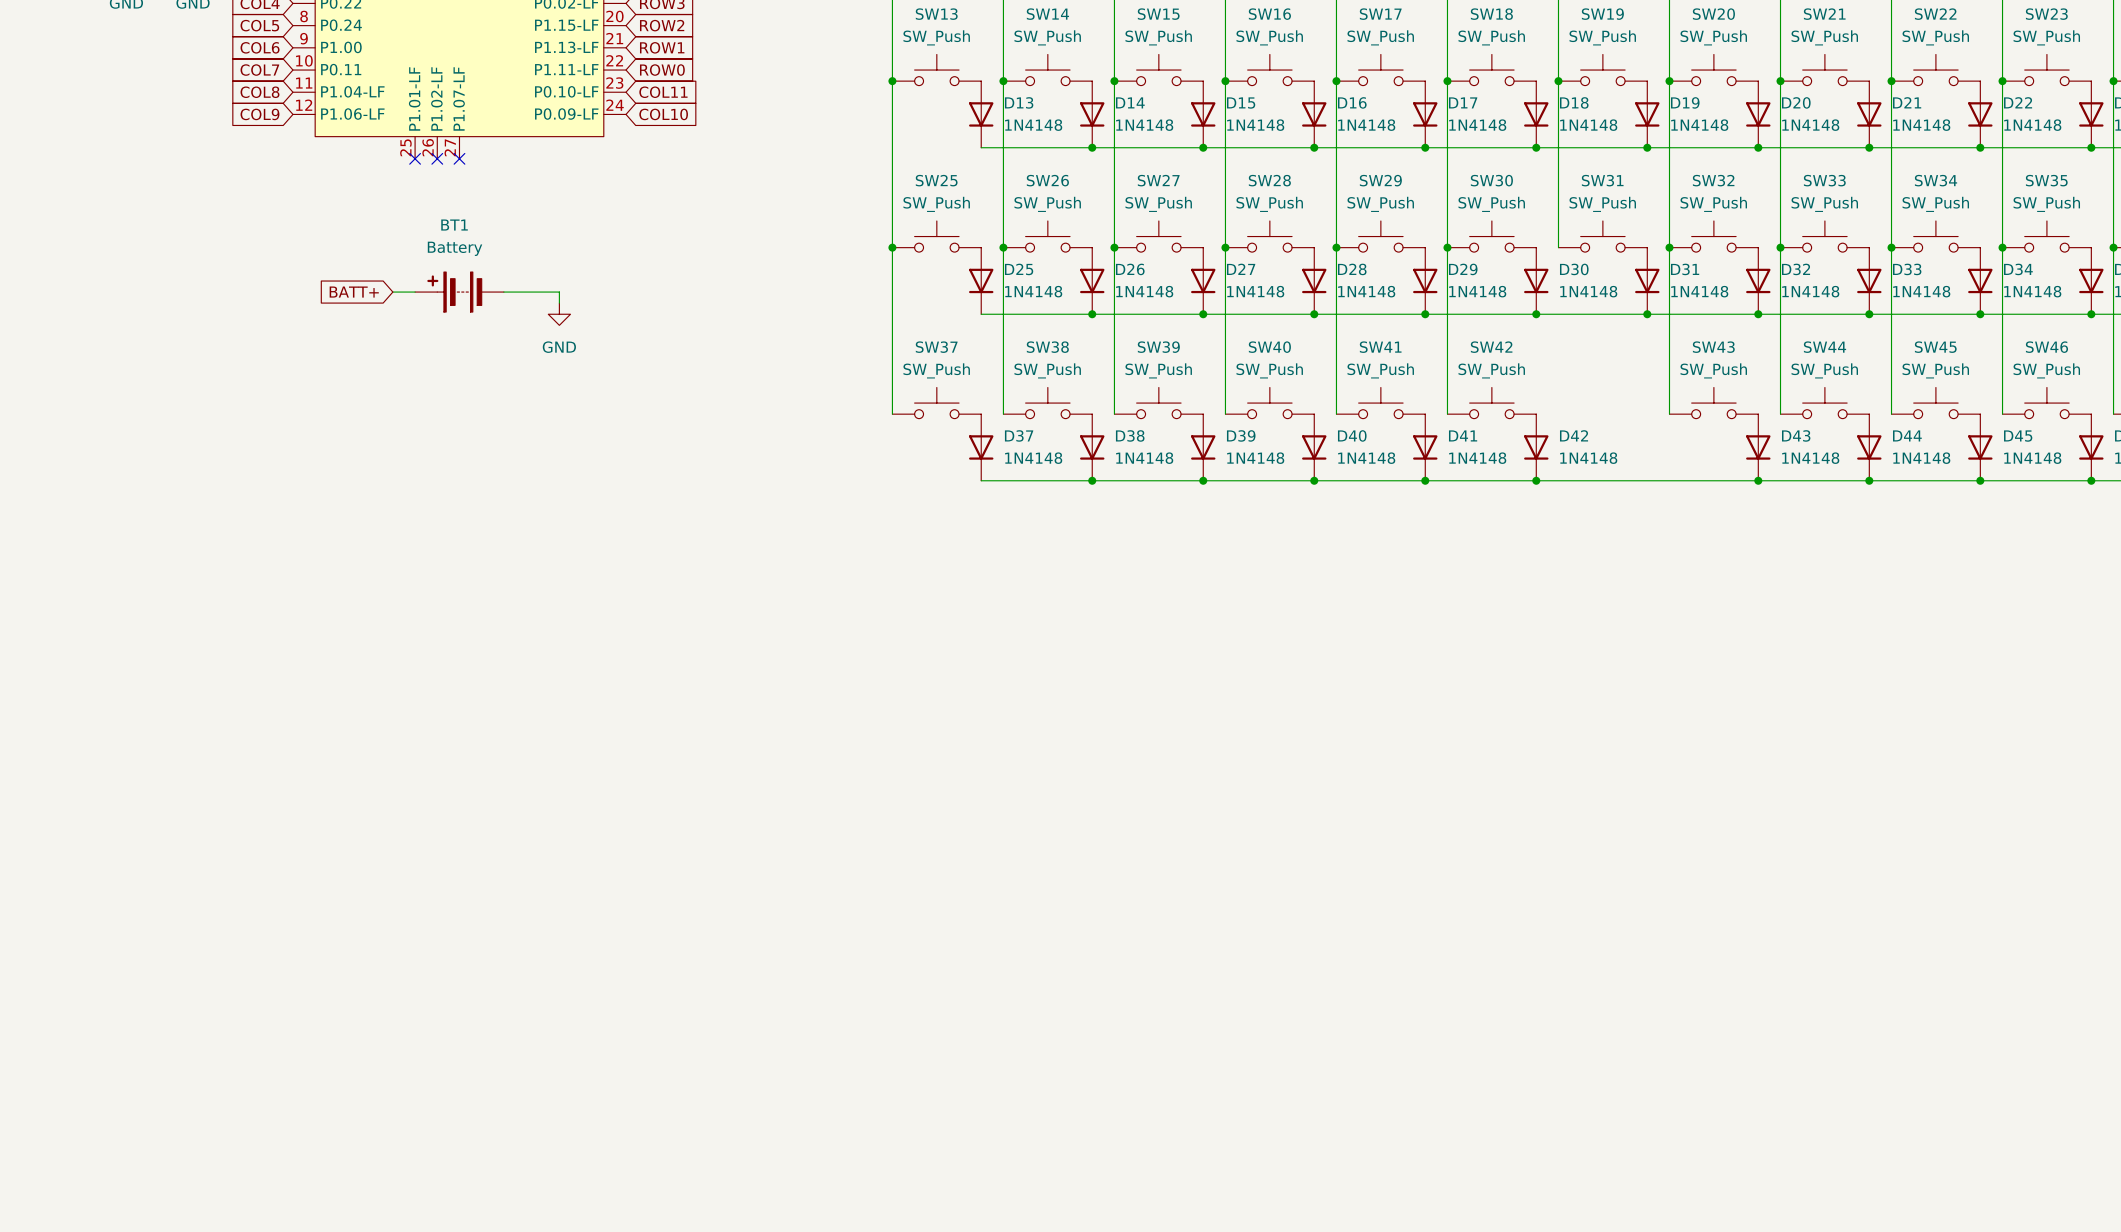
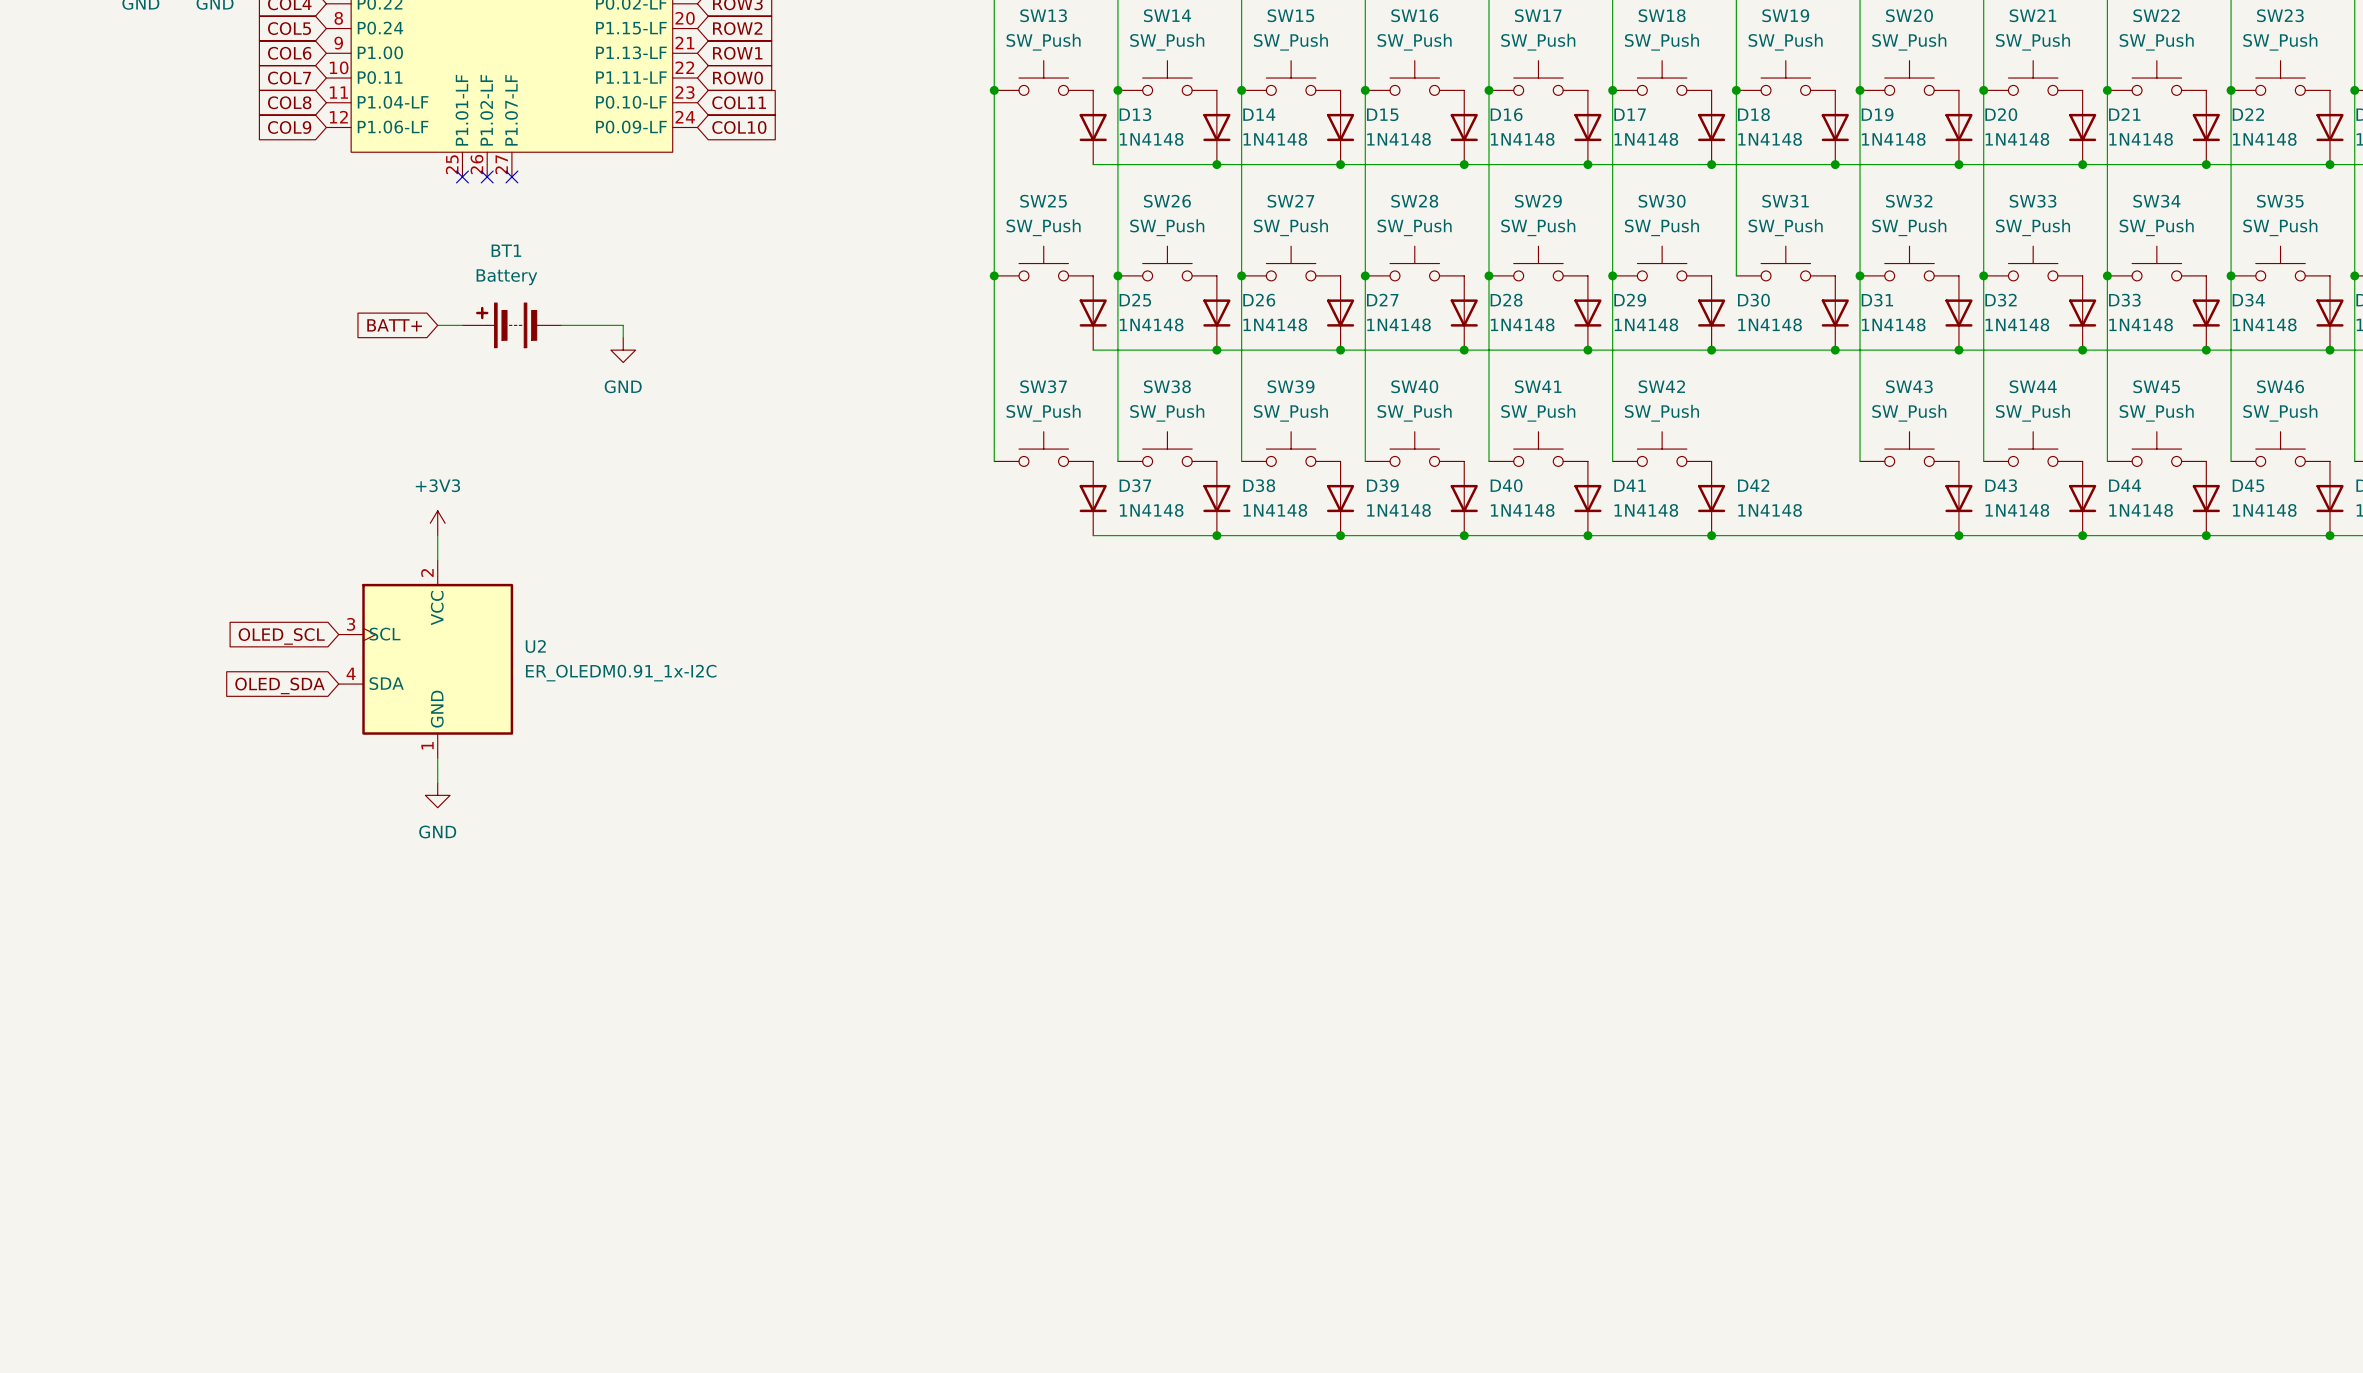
power symbol: none -> +3V3 (437, 523)
wire: none -> (437, 535) (437, 560)
global label: none -> OLED_SCL (281, 636)
U2: none -> ER_OLEDM0.91_1x-I2C (425, 659)
global label: none -> OLED_SDA (280, 685)
wire: none -> (437, 758) (437, 782)
power symbol: none -> GND (437, 795)

